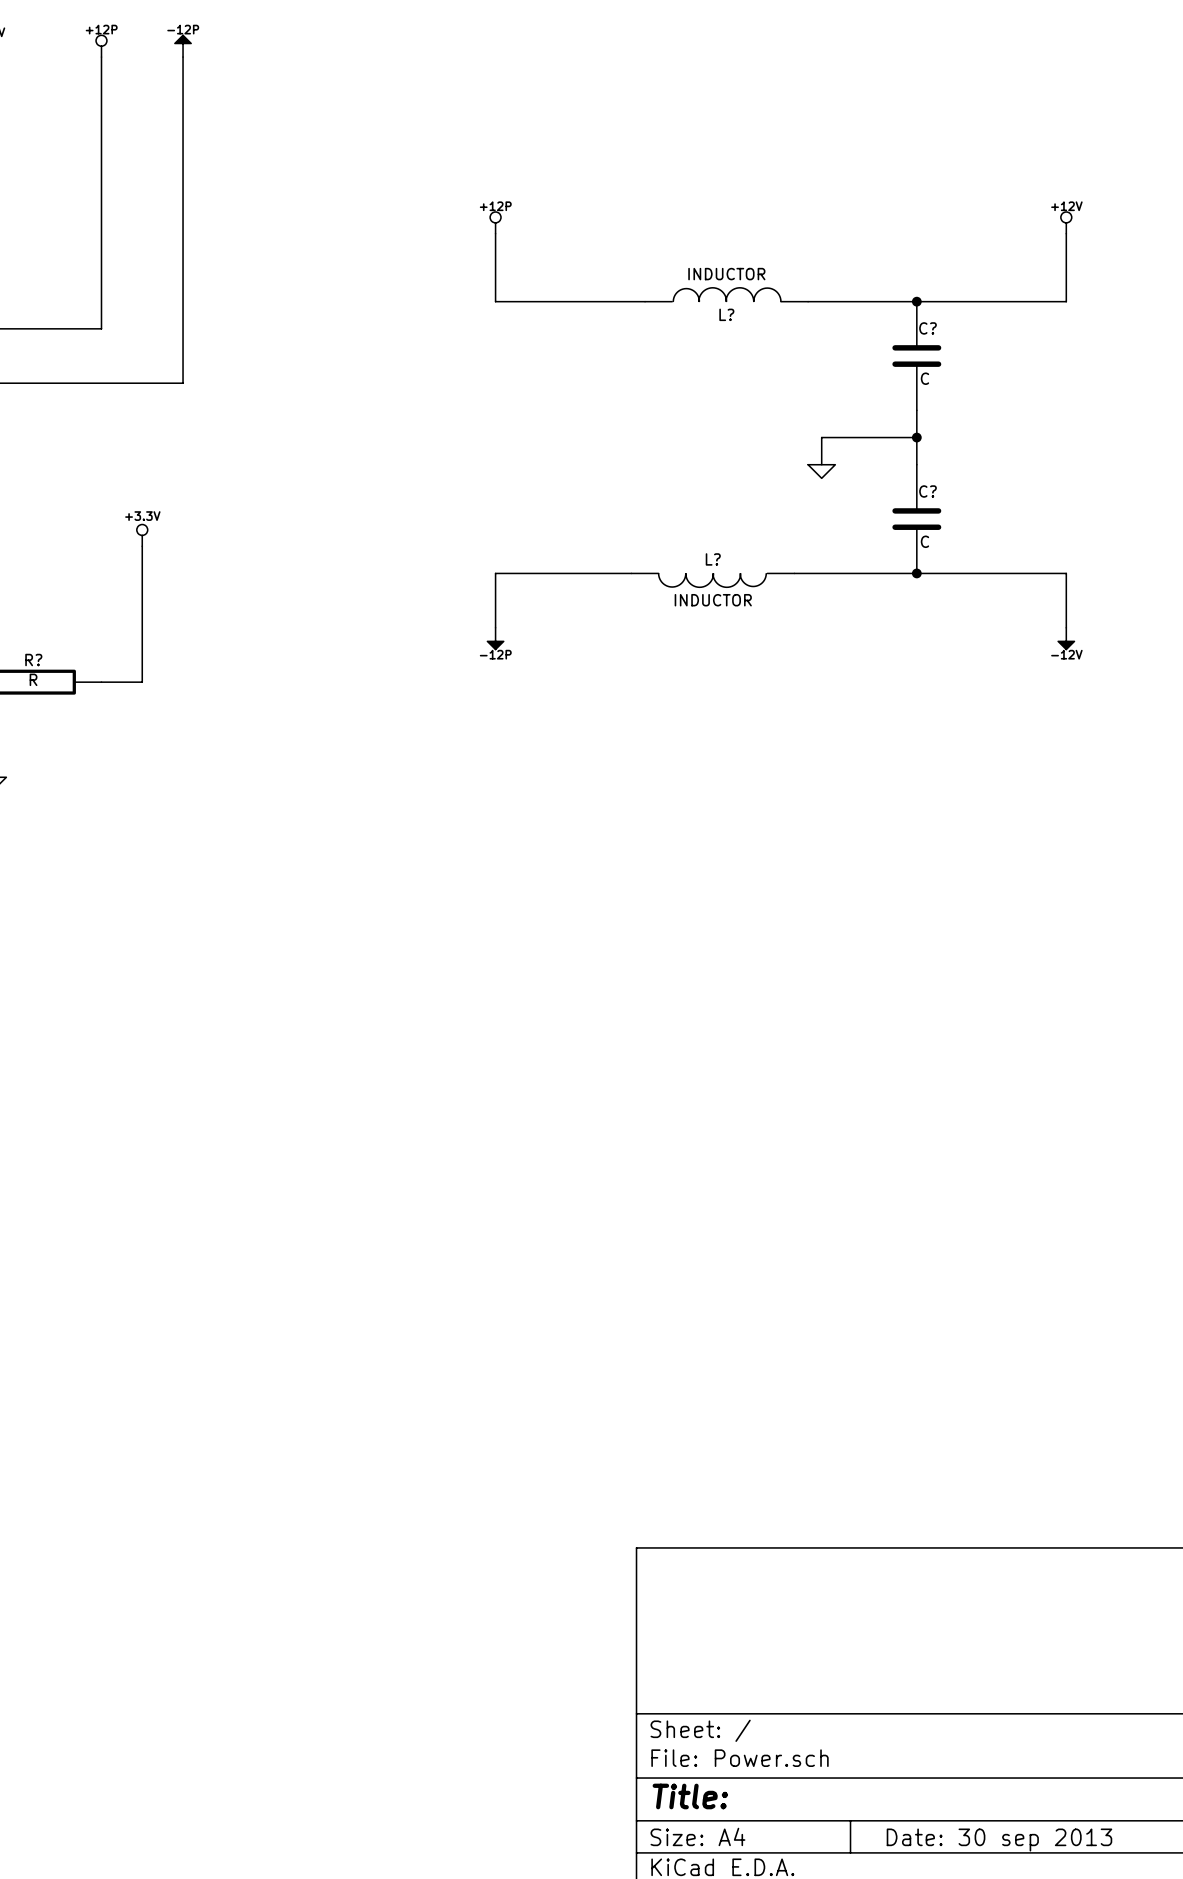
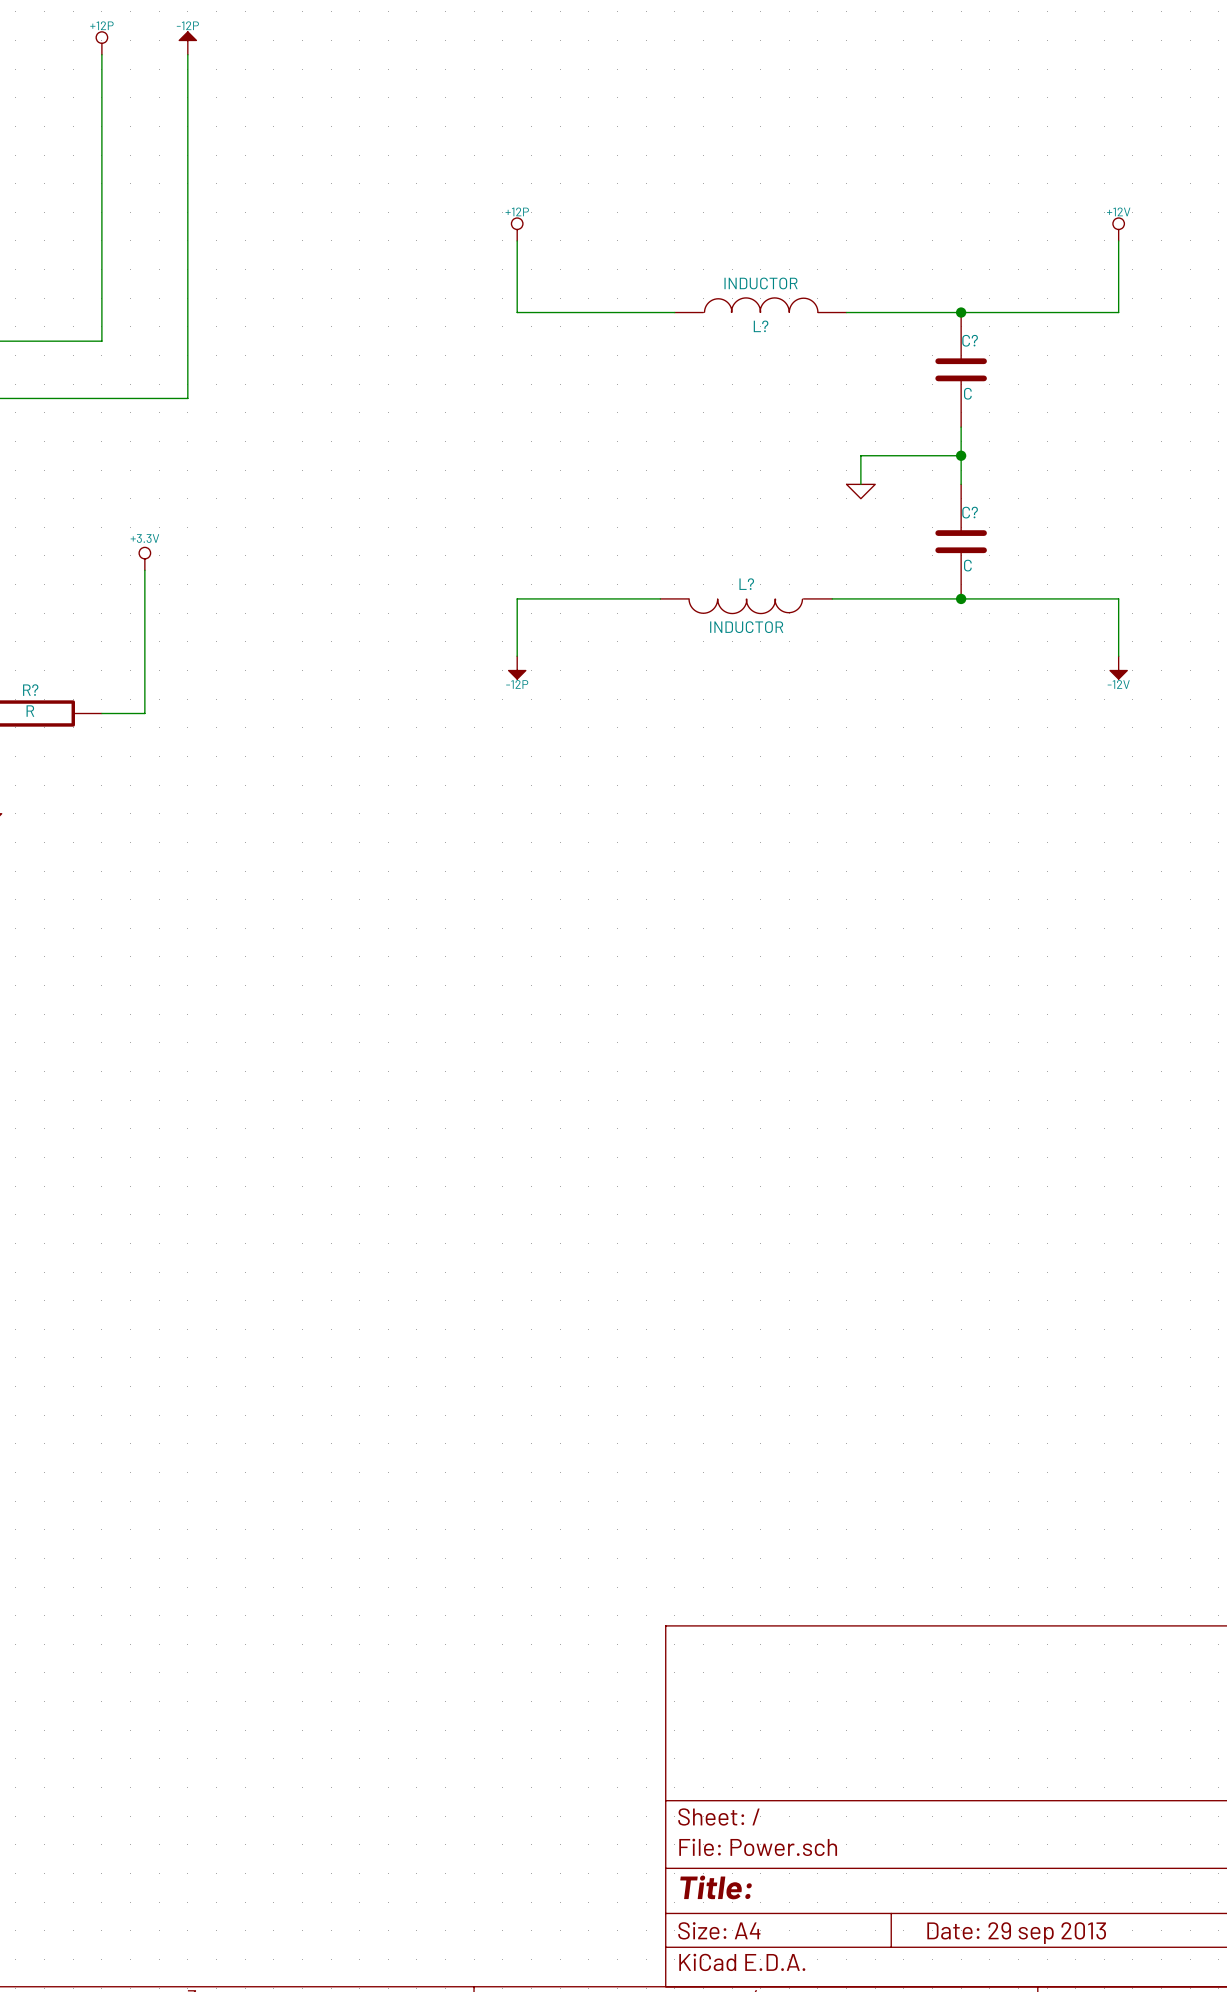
title block: Date: 30 sep 2013 (999, 1840) -> Date: 29 sep 2013 (1016, 1933)

